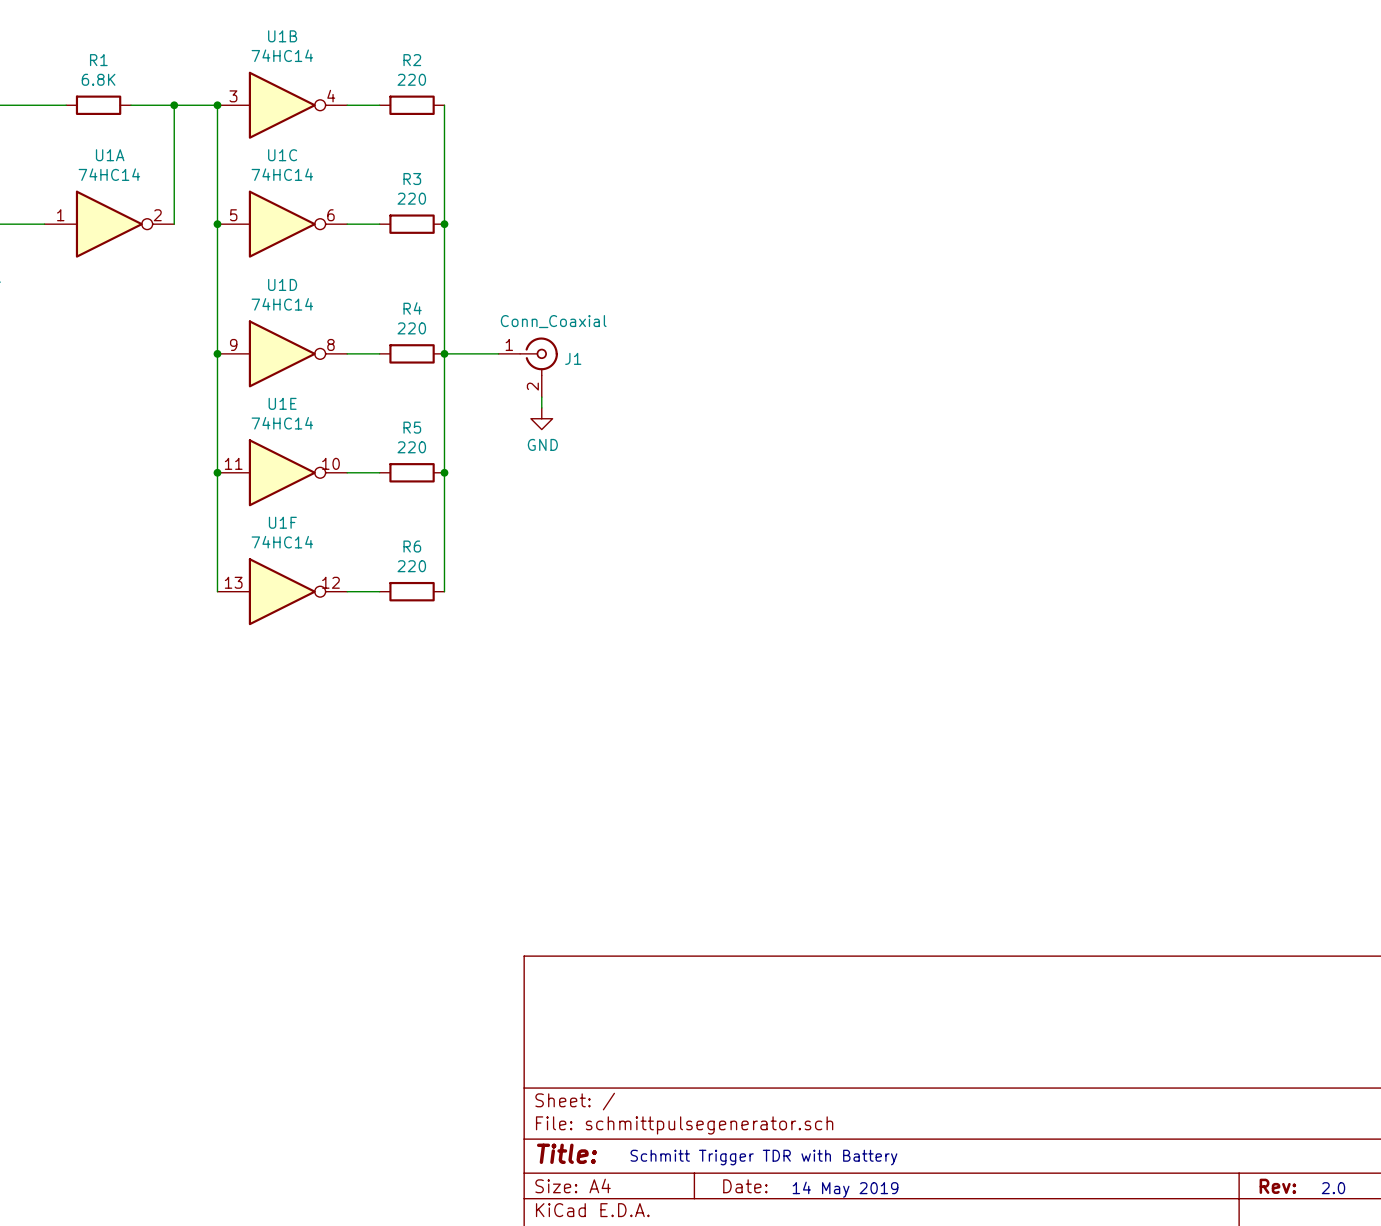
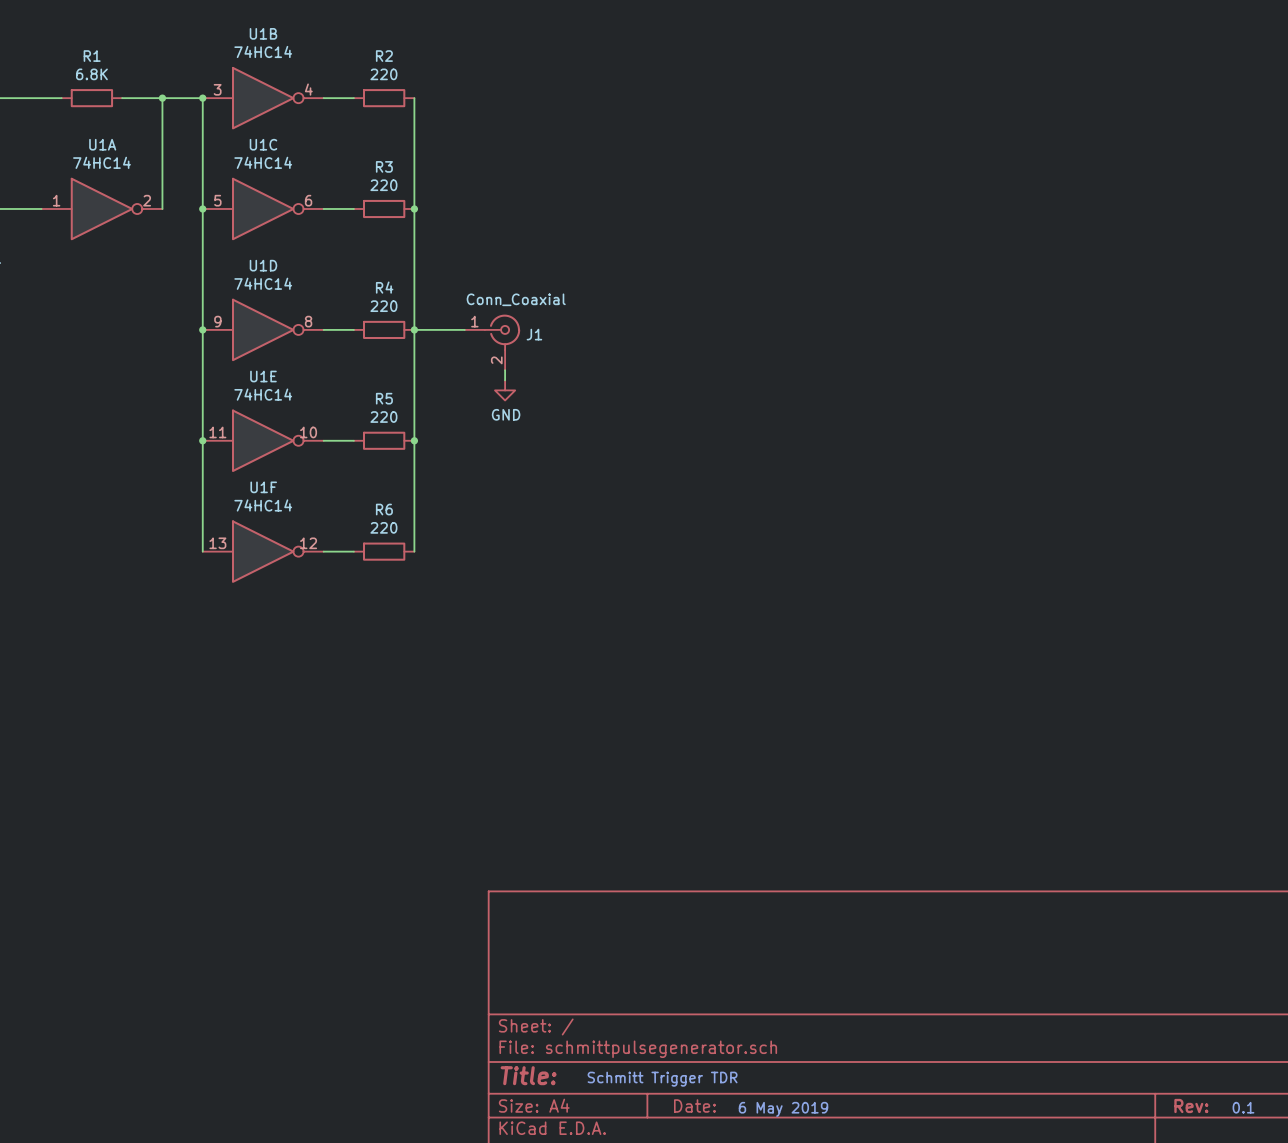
text: Schmitt Trigger TDR with Battery (763, 1157) -> Schmitt Trigger TDR (662, 1079)
text: 2.0 (1333, 1188) -> 0.1 (1243, 1107)
text: 14 May 2019 (845, 1189) -> 6 May 2019 (783, 1109)

